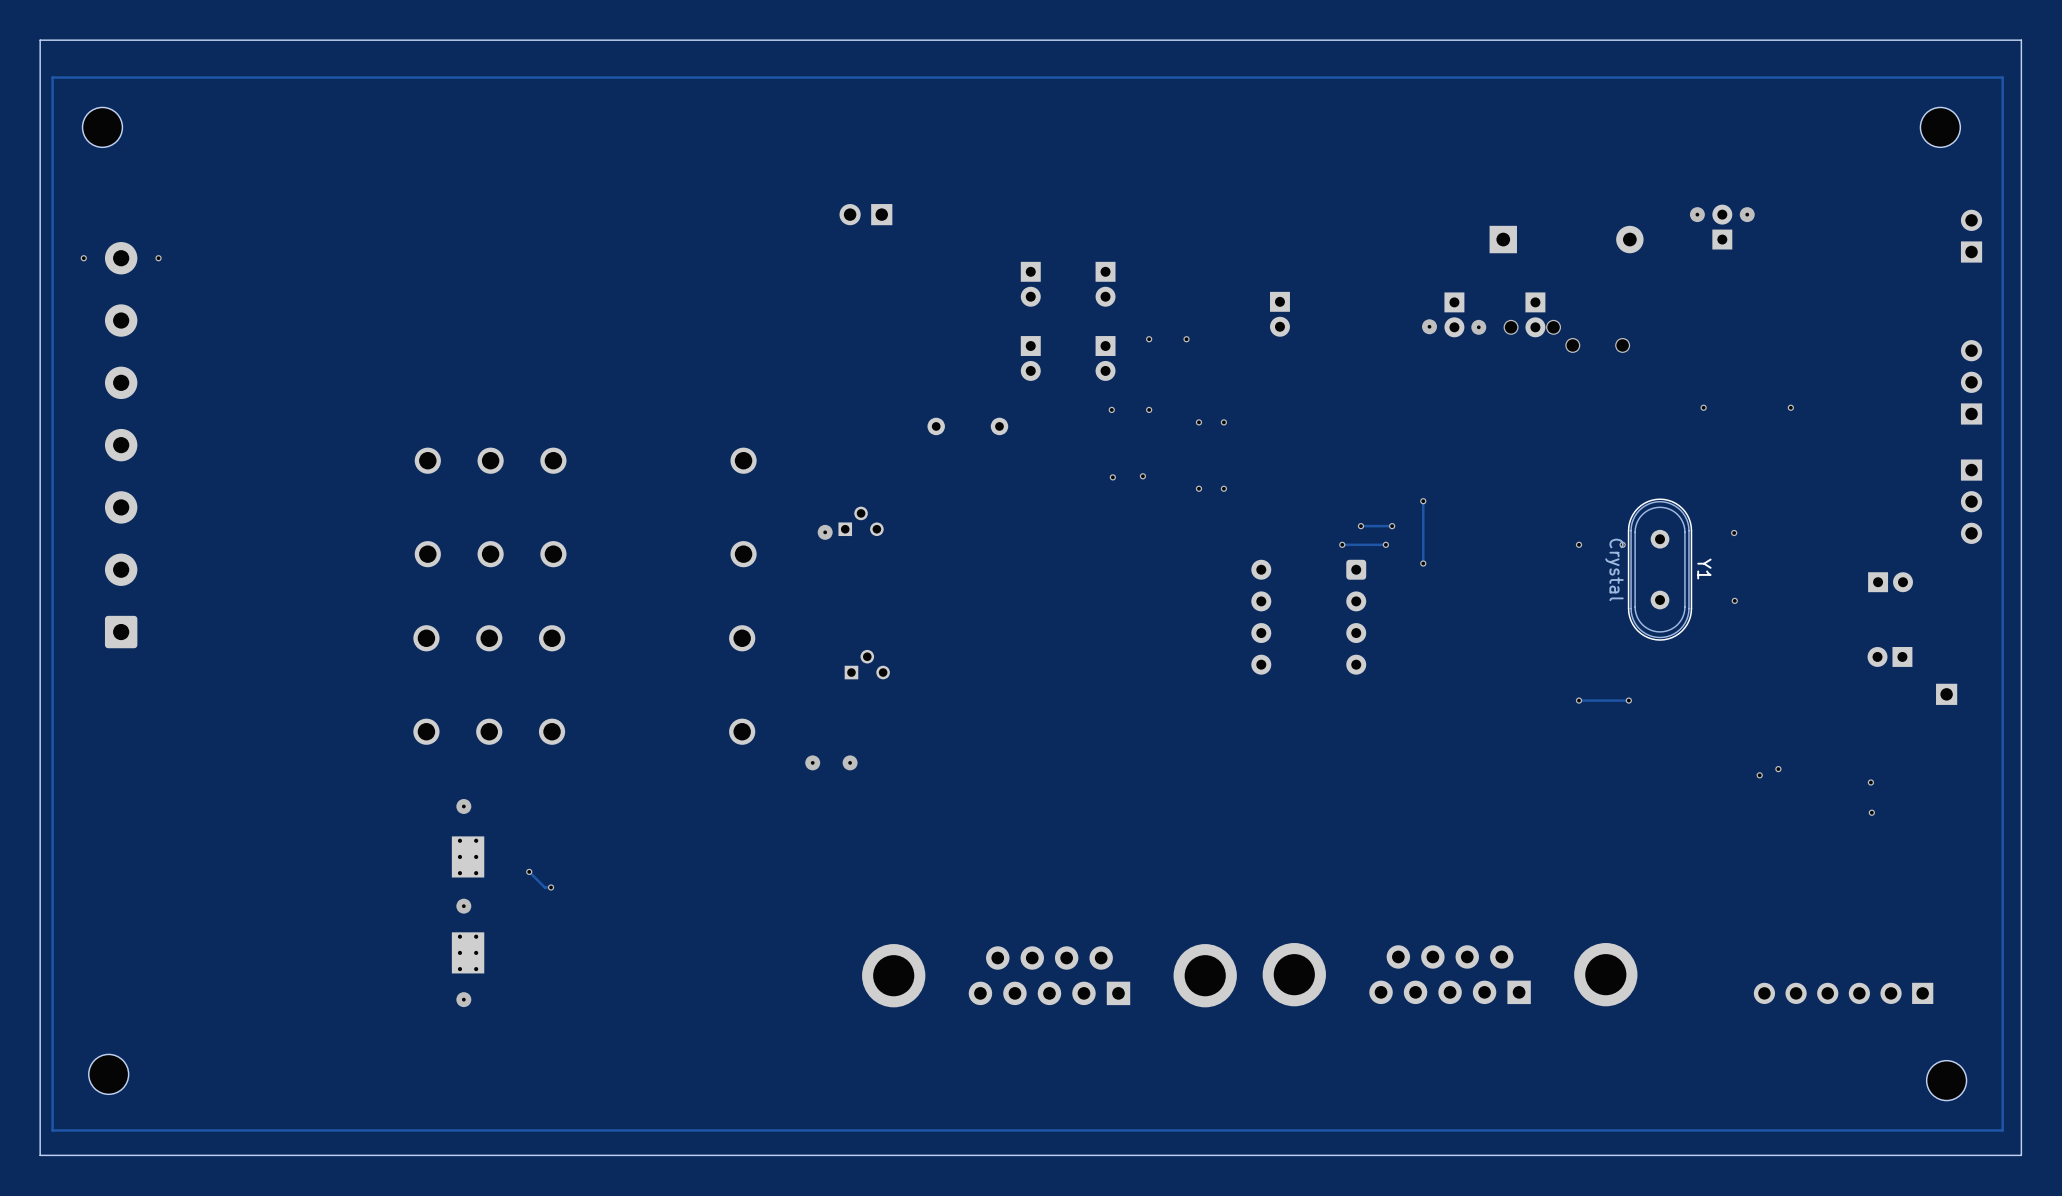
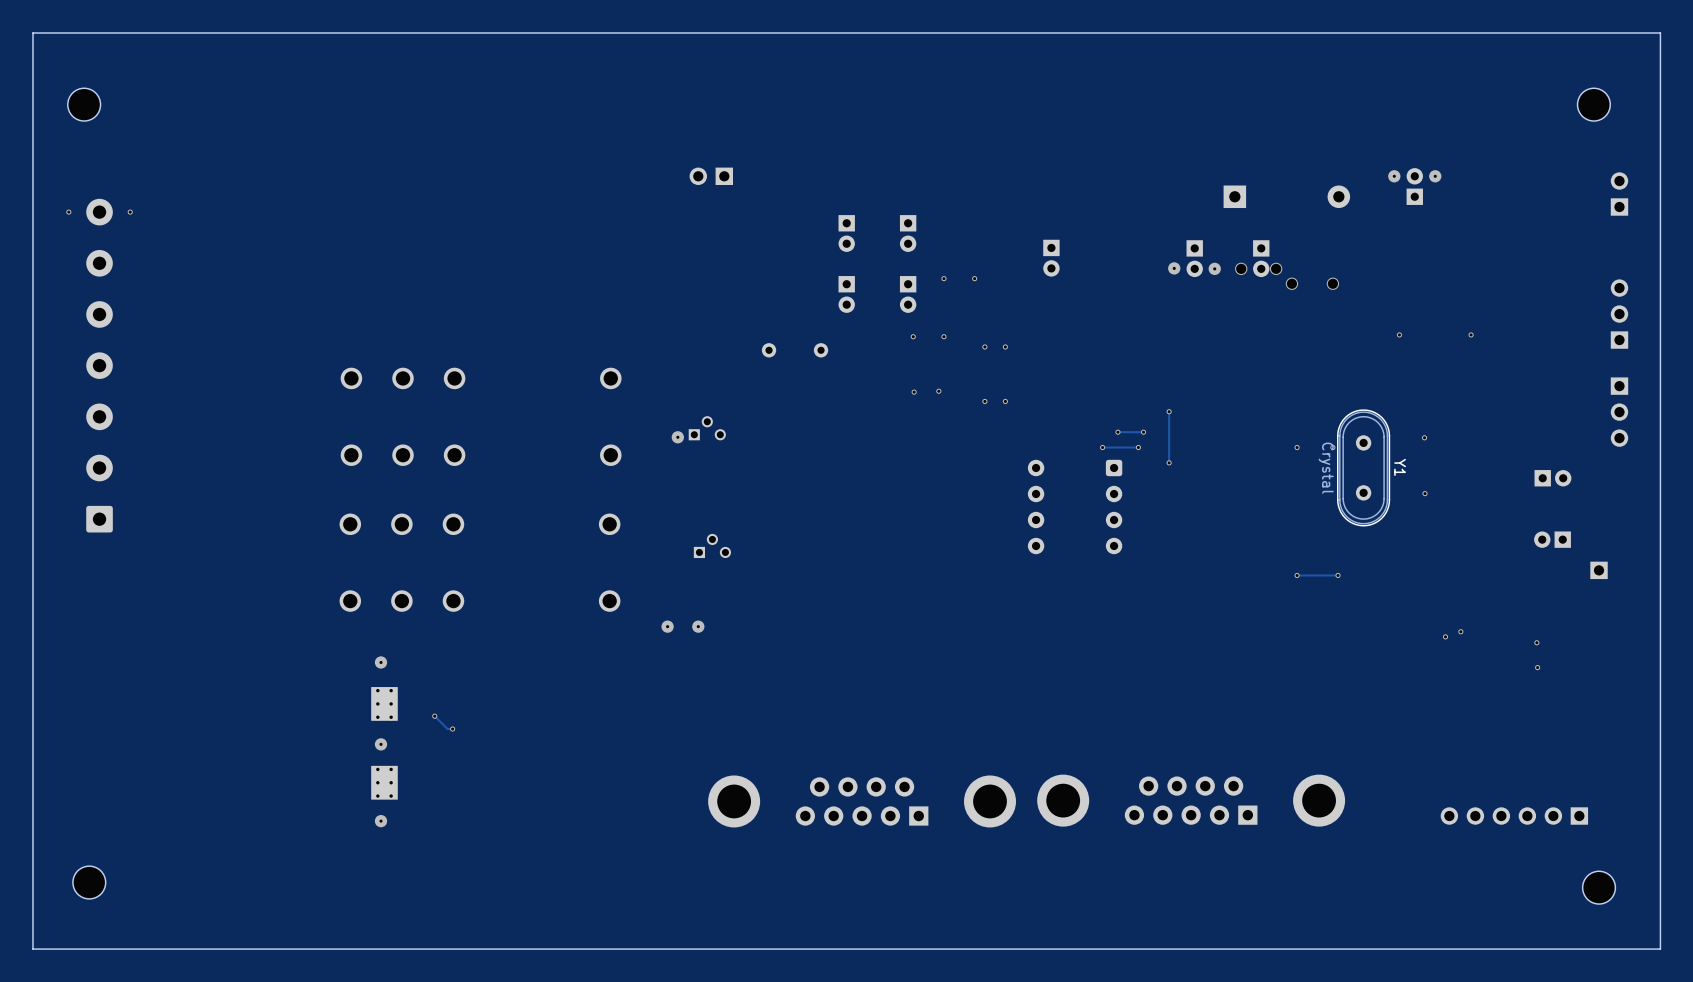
track: (2002, 77) (52, 77) (52, 1130) (2002, 1130) (2002, 77) -> none

